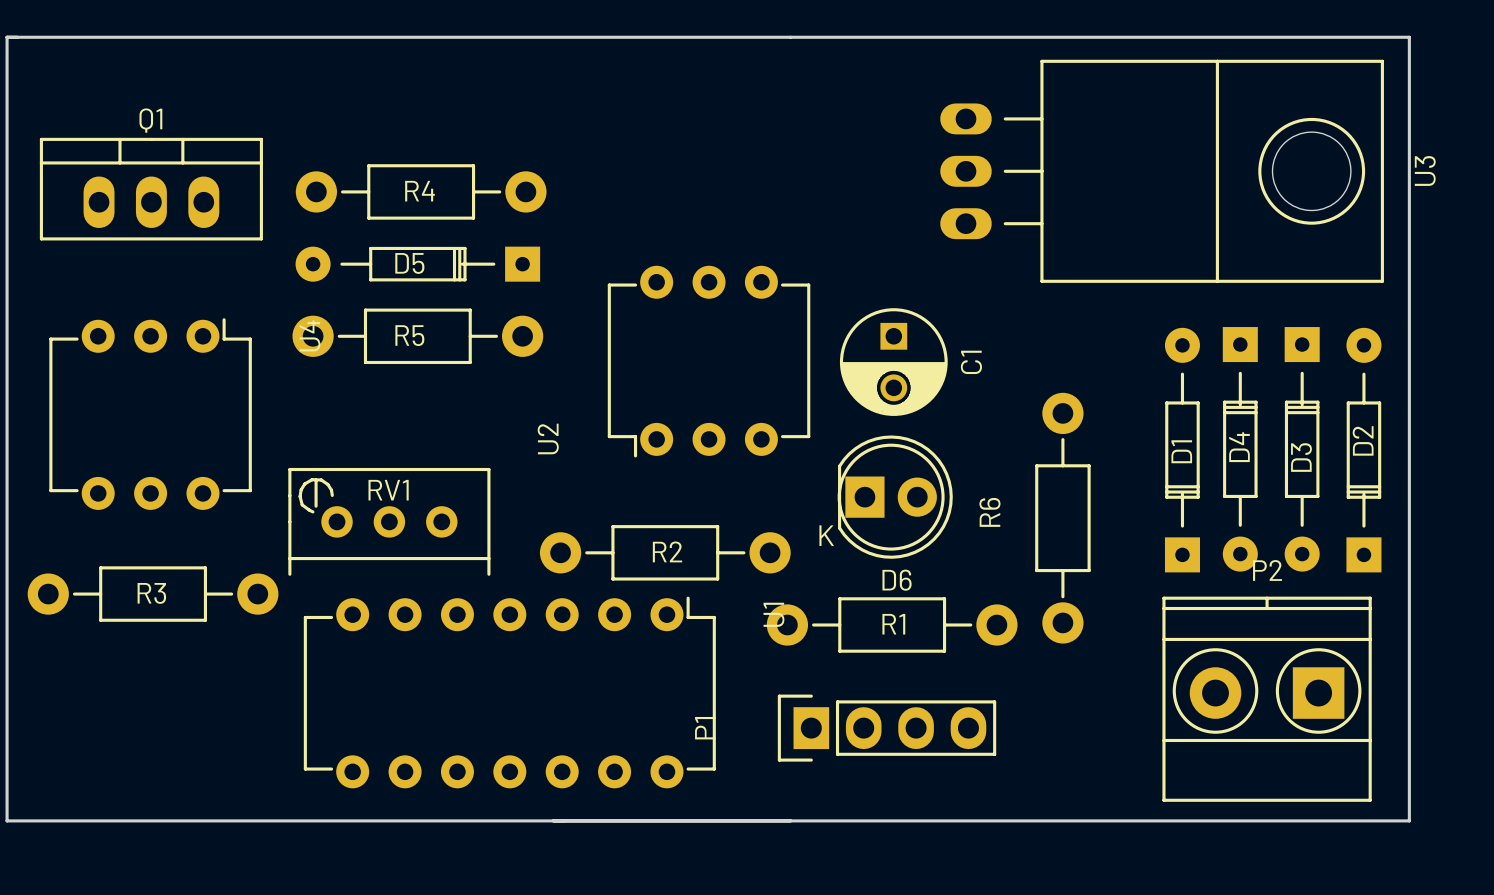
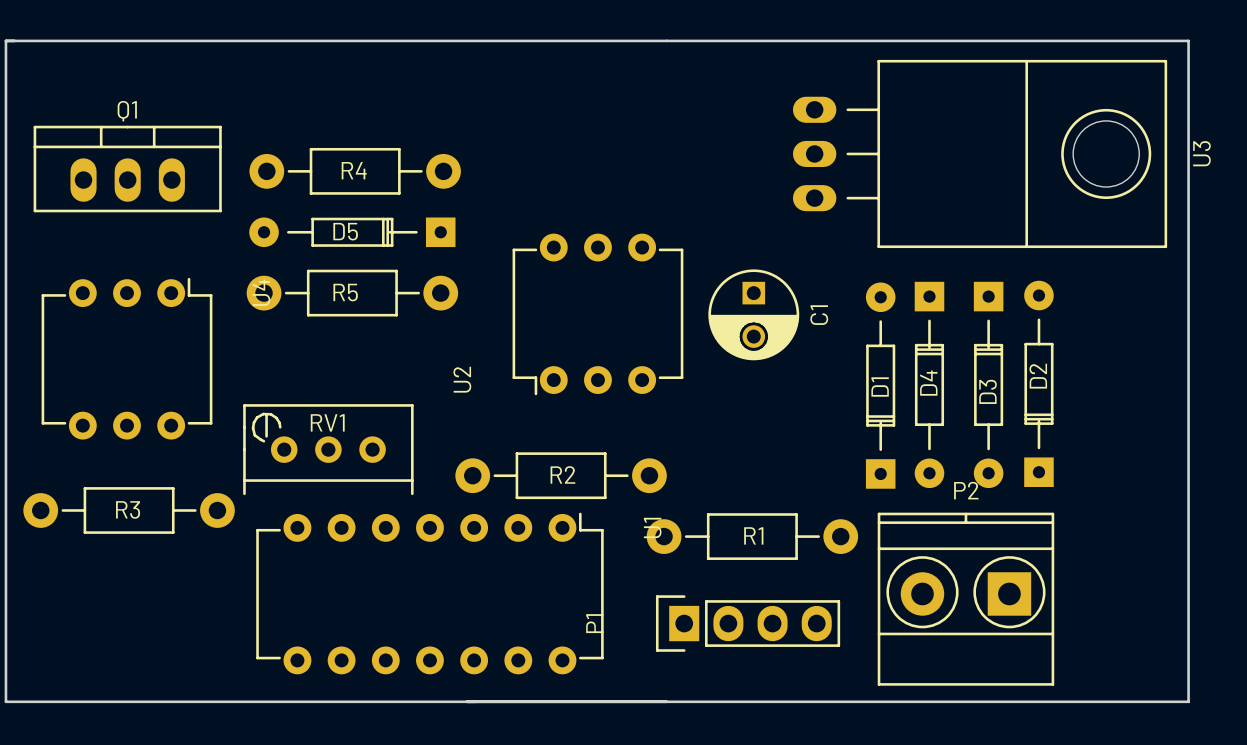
D4 position: (1240, 449) -> (929, 384)
D3 position: (1302, 449) -> (988, 384)
D1 position: (1182, 450) -> (880, 385)
D2 position: (1363, 450) -> (1038, 383)
D6: (895, 497) -> none
R6: (1062, 518) -> none
P2 position: (1267, 699) -> (965, 599)

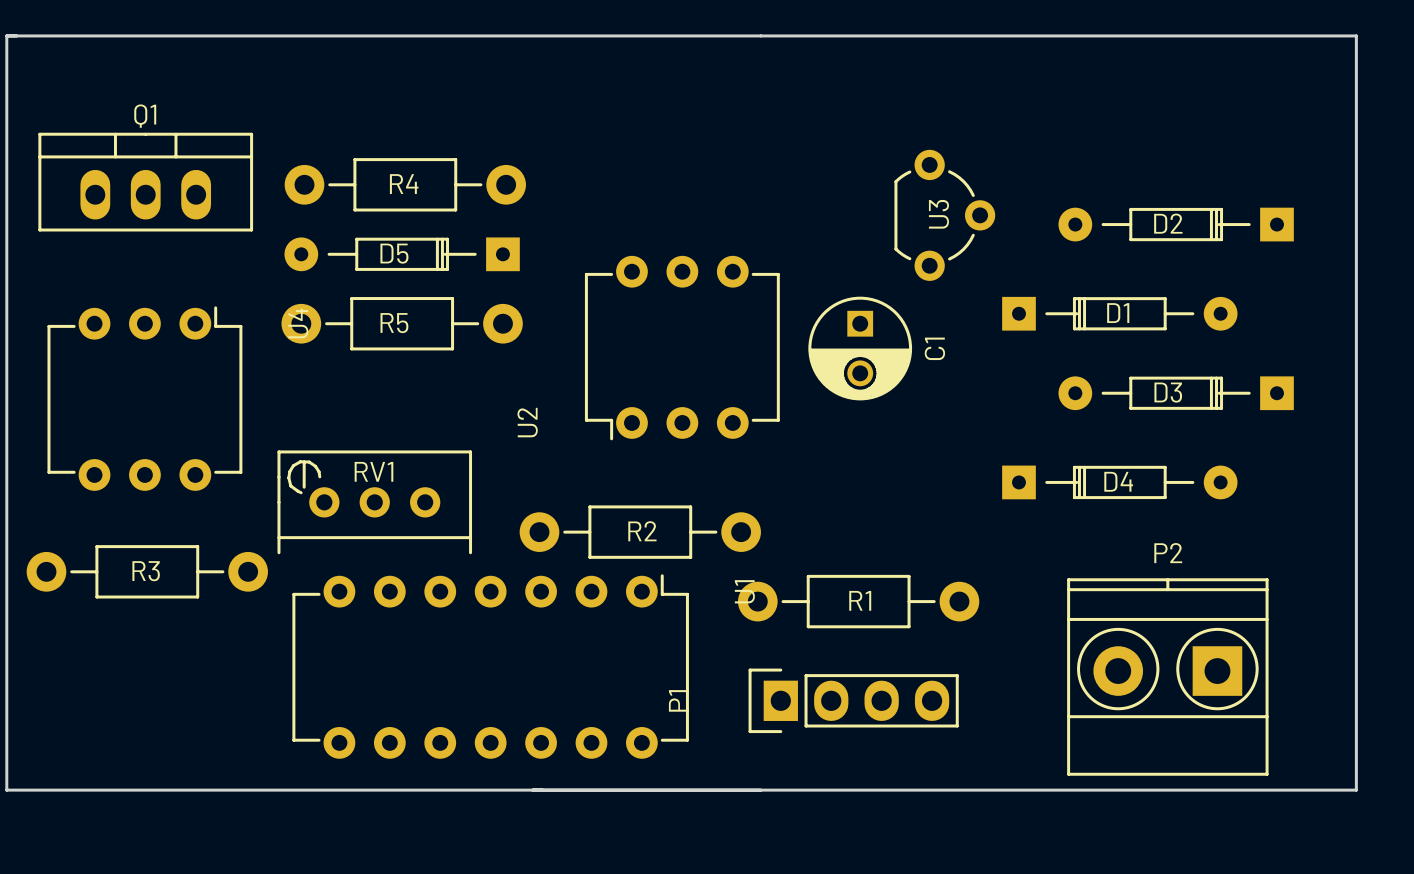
U3 footprint: [792, 59, 1168, 249] -> [894, 149, 996, 281]
U3 name position: U3 (1201, 153) -> U3 (938, 214)
D2 rotation: 0° (1038, 383) -> 90° counterclockwise (1176, 224)
D2 position: (1038, 383) -> (1176, 224)
D4 rotation: 0° (929, 384) -> 90° counterclockwise (1119, 482)
D3 rotation: 0° (988, 384) -> 90° clockwise (1176, 393)
D1 rotation: 0° (880, 385) -> 90° clockwise (1119, 313)
D1 position: (880, 385) -> (1119, 313)
P2 position: (965, 599) -> (1167, 677)

